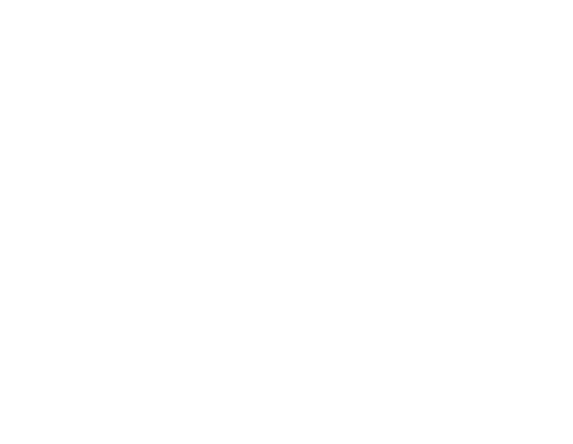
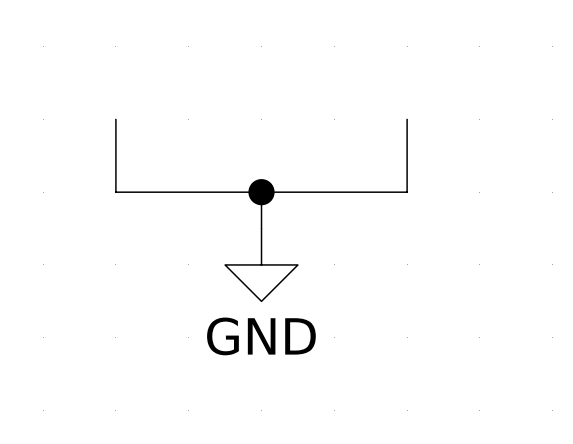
wire: none -> (115, 119) (115, 192) (407, 192) (407, 119)
wire: none -> (261, 192) (261, 228)
junction: none -> (261, 192)
power symbol: none -> GND (261, 264)

